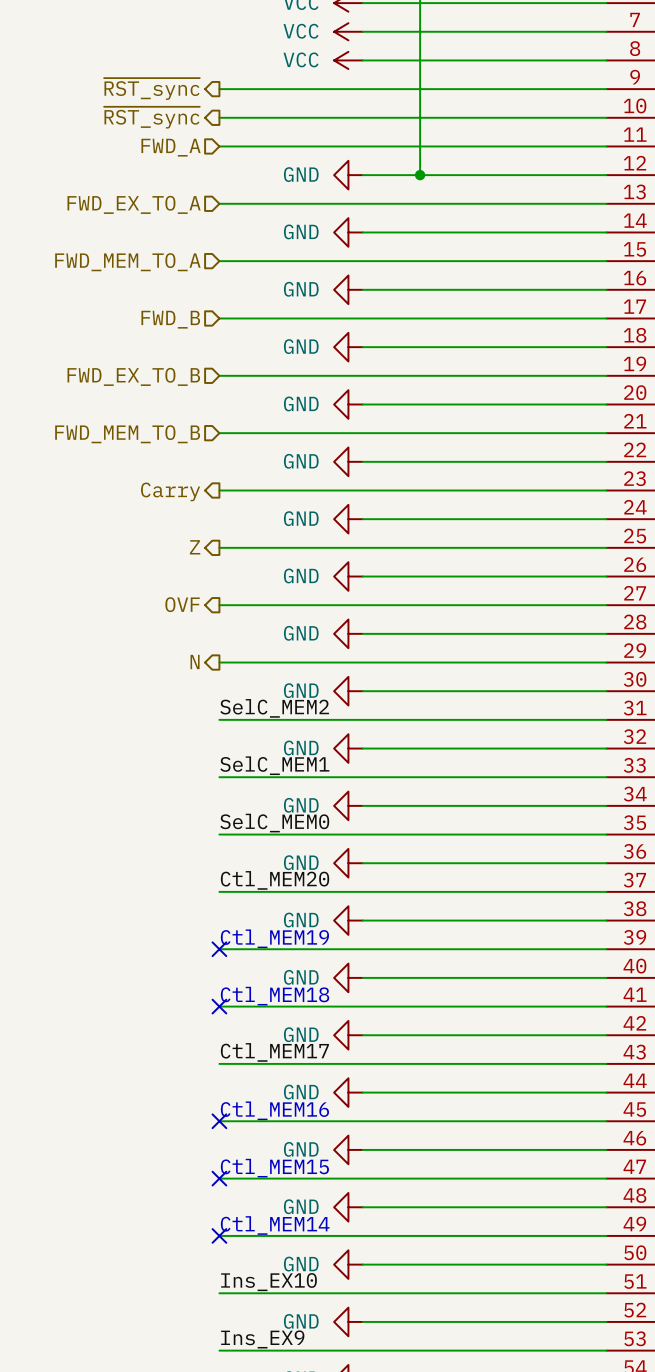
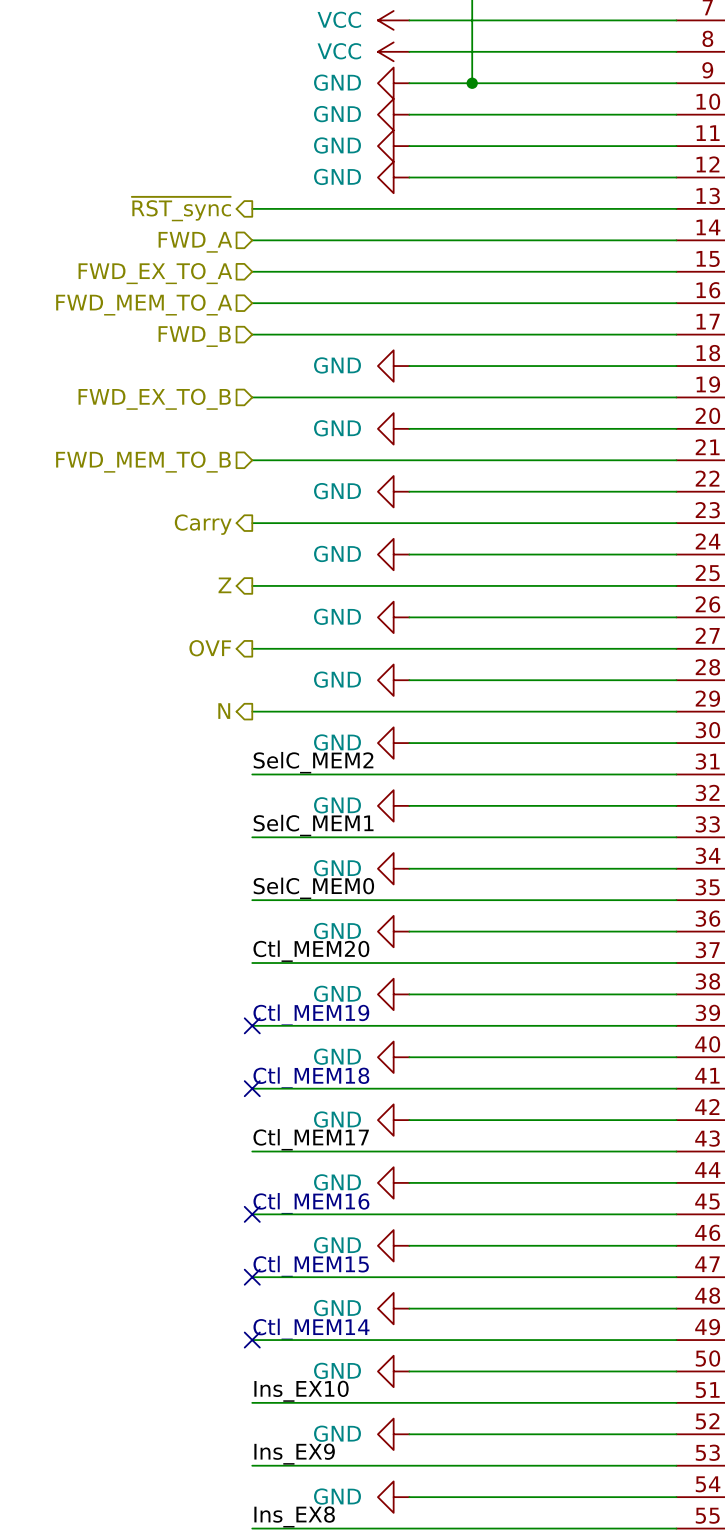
hierarchical label: ~{RST_sync} (151, 88) -> none
wire: (219, 89) (362, 89) -> (252, 240) (409, 240)
power symbol: none -> GND (393, 83)
wire: (420, 89) (420, 175) -> none
junction: none -> (472, 83)
hierarchical label: ~{RST_sync} (151, 117) -> none
wire: (219, 117) (362, 117) -> none
power symbol: none -> GND (393, 114)
wire: (219, 146) (362, 146) -> (252, 303) (409, 303)
power symbol: none -> GND (393, 146)
hierarchical label position: FWD_A (171, 147) -> FWD_A (195, 242)
junction: (420, 175) -> none
hierarchical label shape: input (134, 204) -> output (181, 209)
hierarchical label: FWD_EX_TO_A (134, 204) -> ~{RST_sync} (181, 209)
power symbol: GND (348, 232) -> none
hierarchical label: FWD_MEM_TO_A (127, 262) -> FWD_EX_TO_A (155, 273)
power symbol: GND (348, 289) -> none
hierarchical label: none -> FWD_MEM_TO_A (144, 304)

